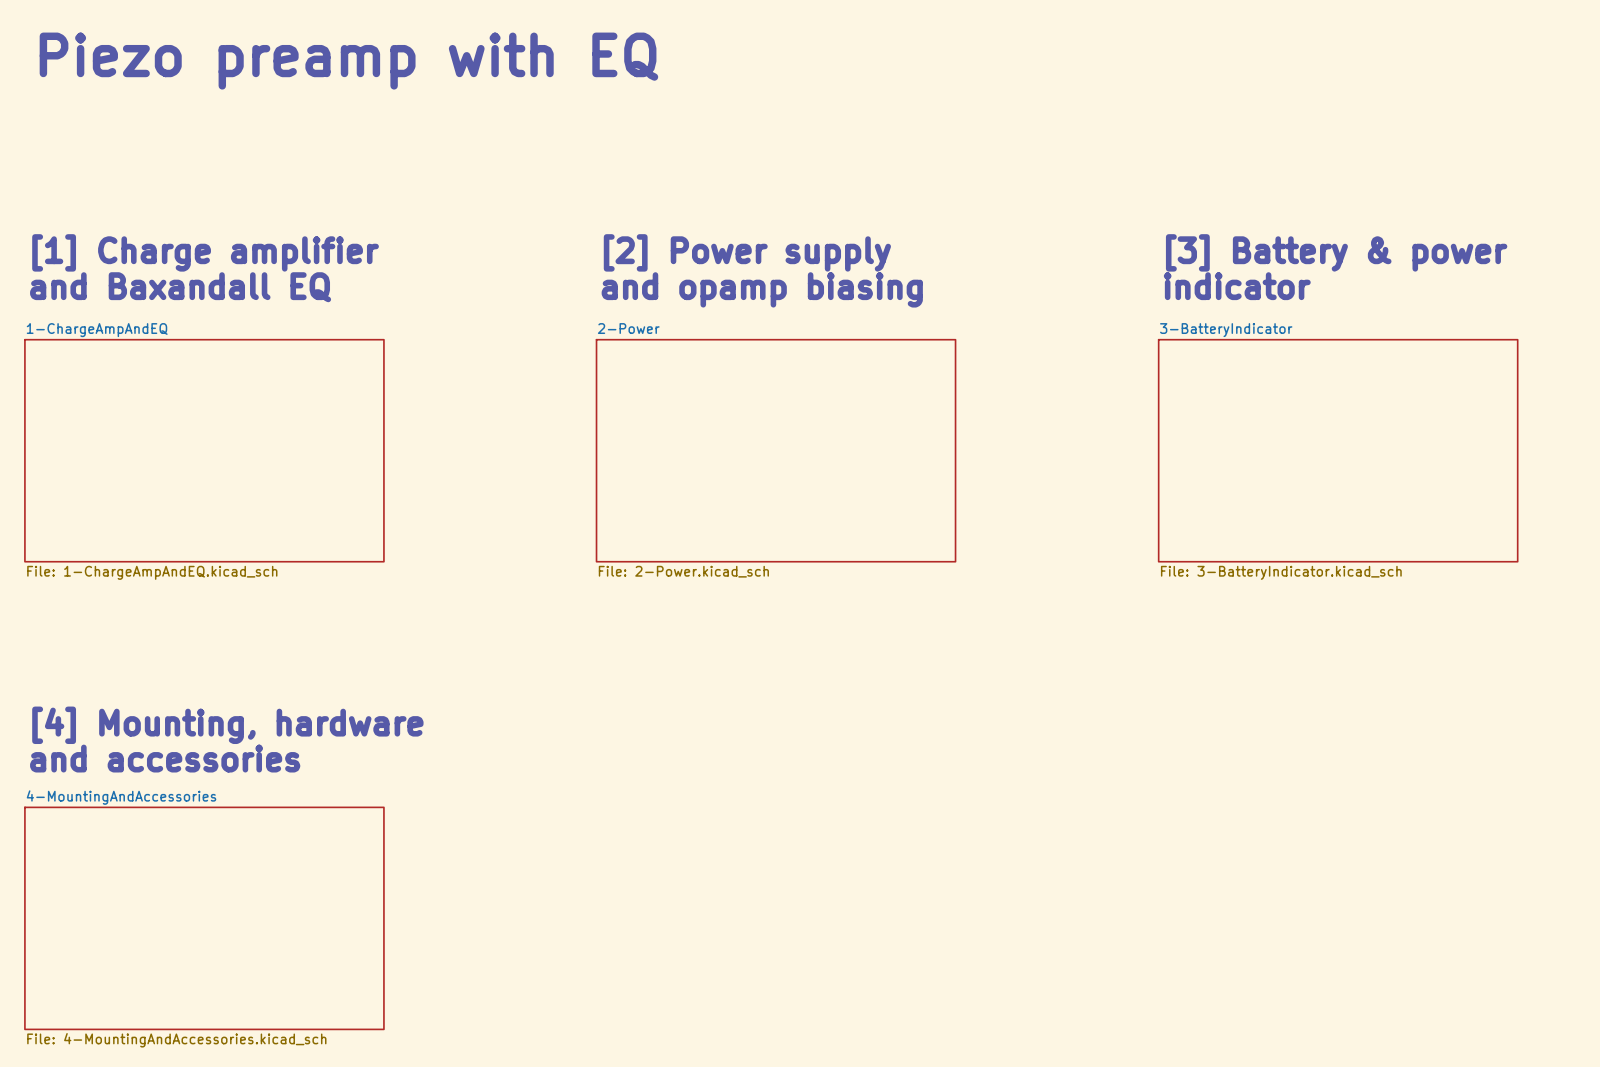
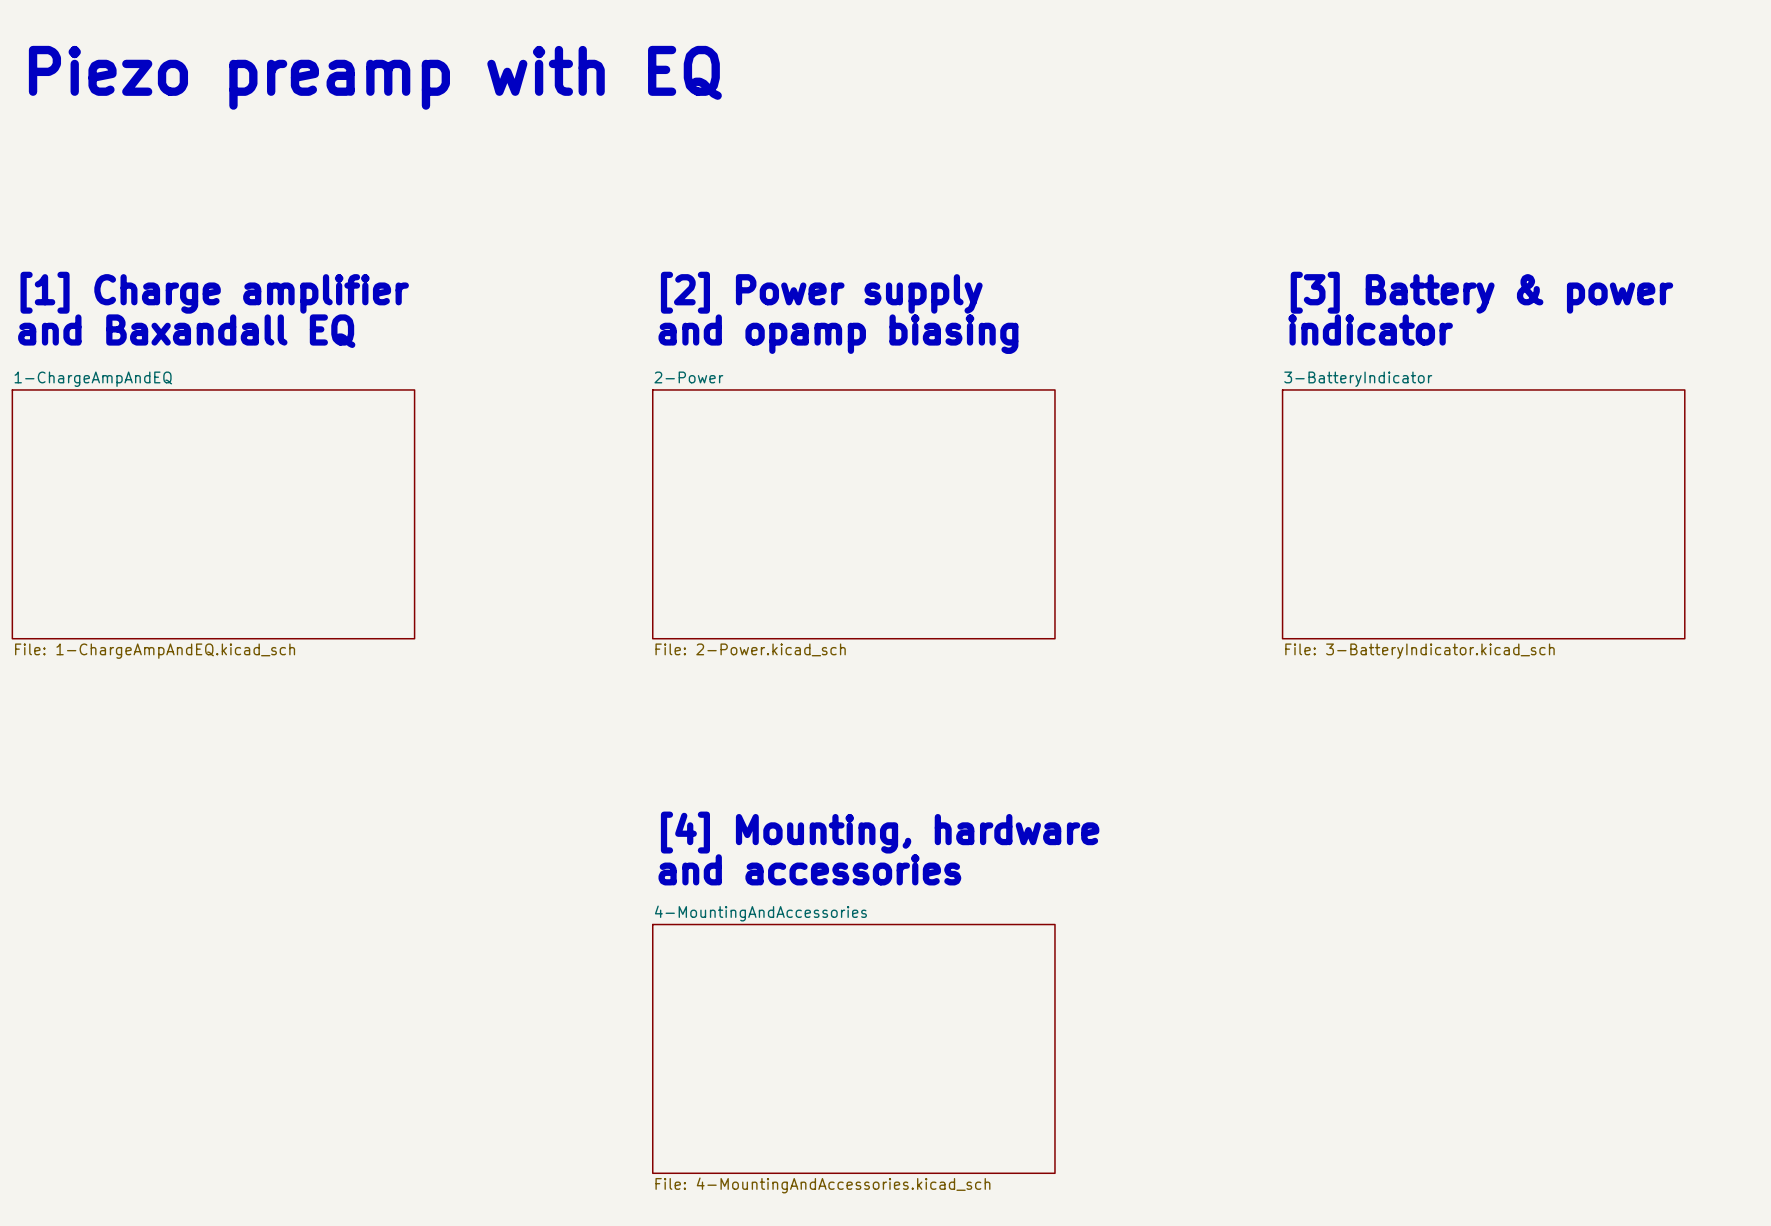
text: [4] Mounting, hardware (227, 725) -> none
text: none -> [4] Mounting, hardware (880, 832)
text: and accessories (165, 758) -> none
text: none -> and accessories (809, 869)
sheet 4-MountingAndAccessories position: (204, 918) -> (853, 1048)

